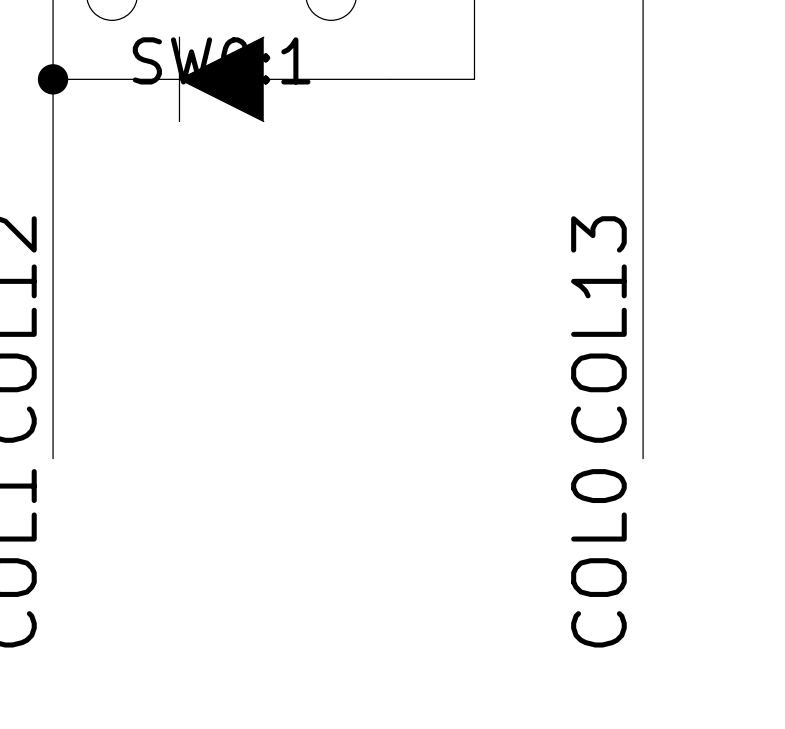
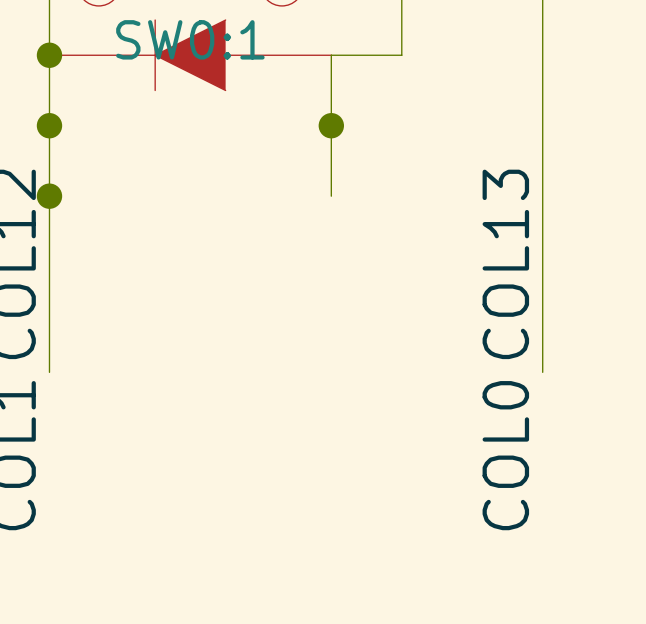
wire: none -> (331, 55) (331, 196)
junction: none -> (49, 125)
junction: none -> (331, 125)
junction: none -> (49, 196)

